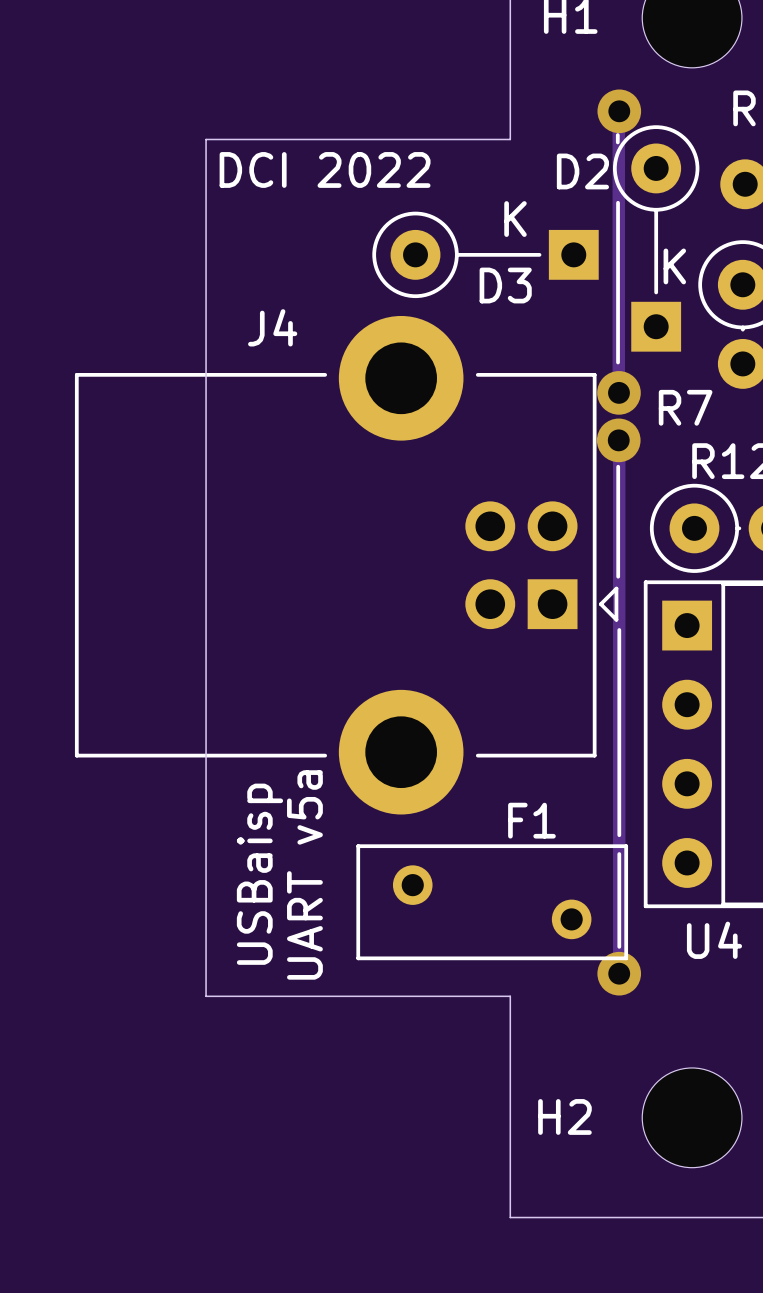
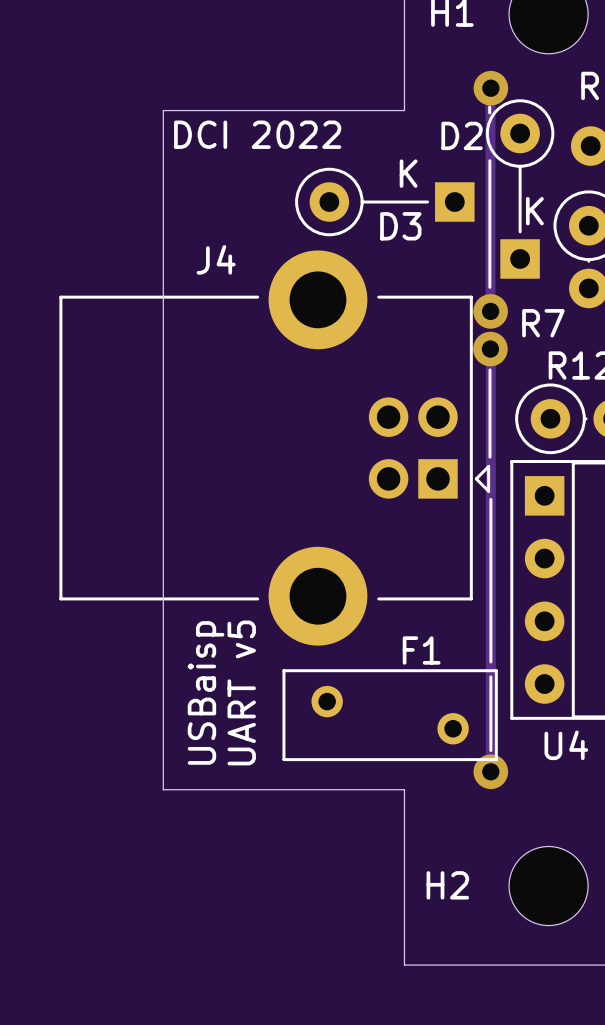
text: UART v5a (304, 874) -> UART v5 (241, 692)

